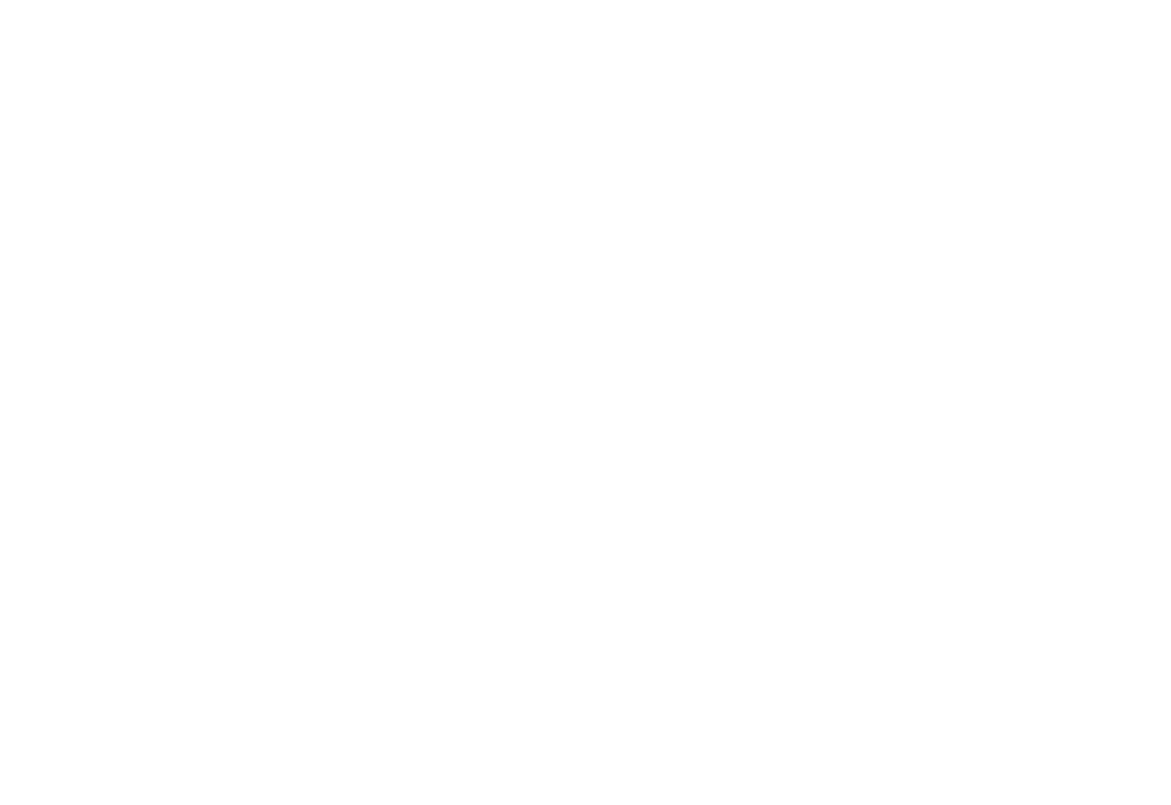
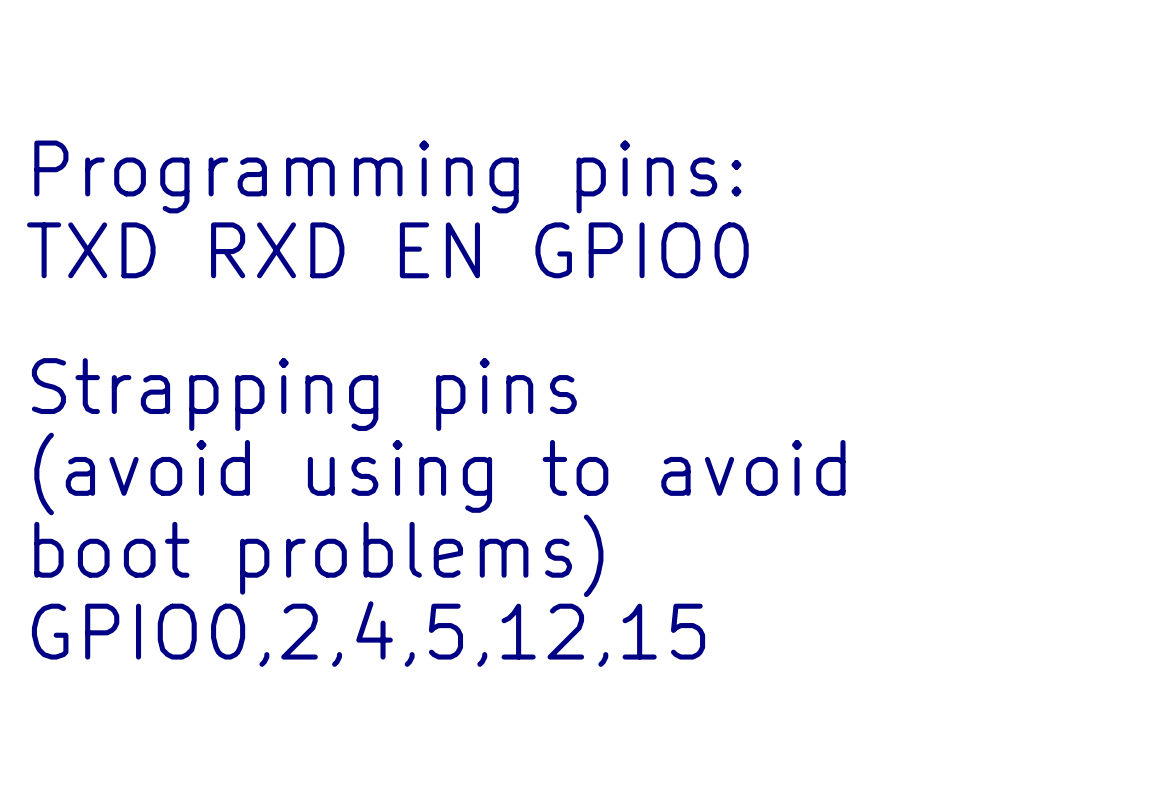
text: none -> Programming pins: (387, 176)
text: none -> TXD RXD EN GPIO0 (387, 250)
text: none -> Strapping pins (304, 394)
text: none -> (avoid using to avoid (439, 473)
text: none -> boot problems) (318, 555)
text: none -> GPIO0,2,4,5,12,15 (368, 634)

